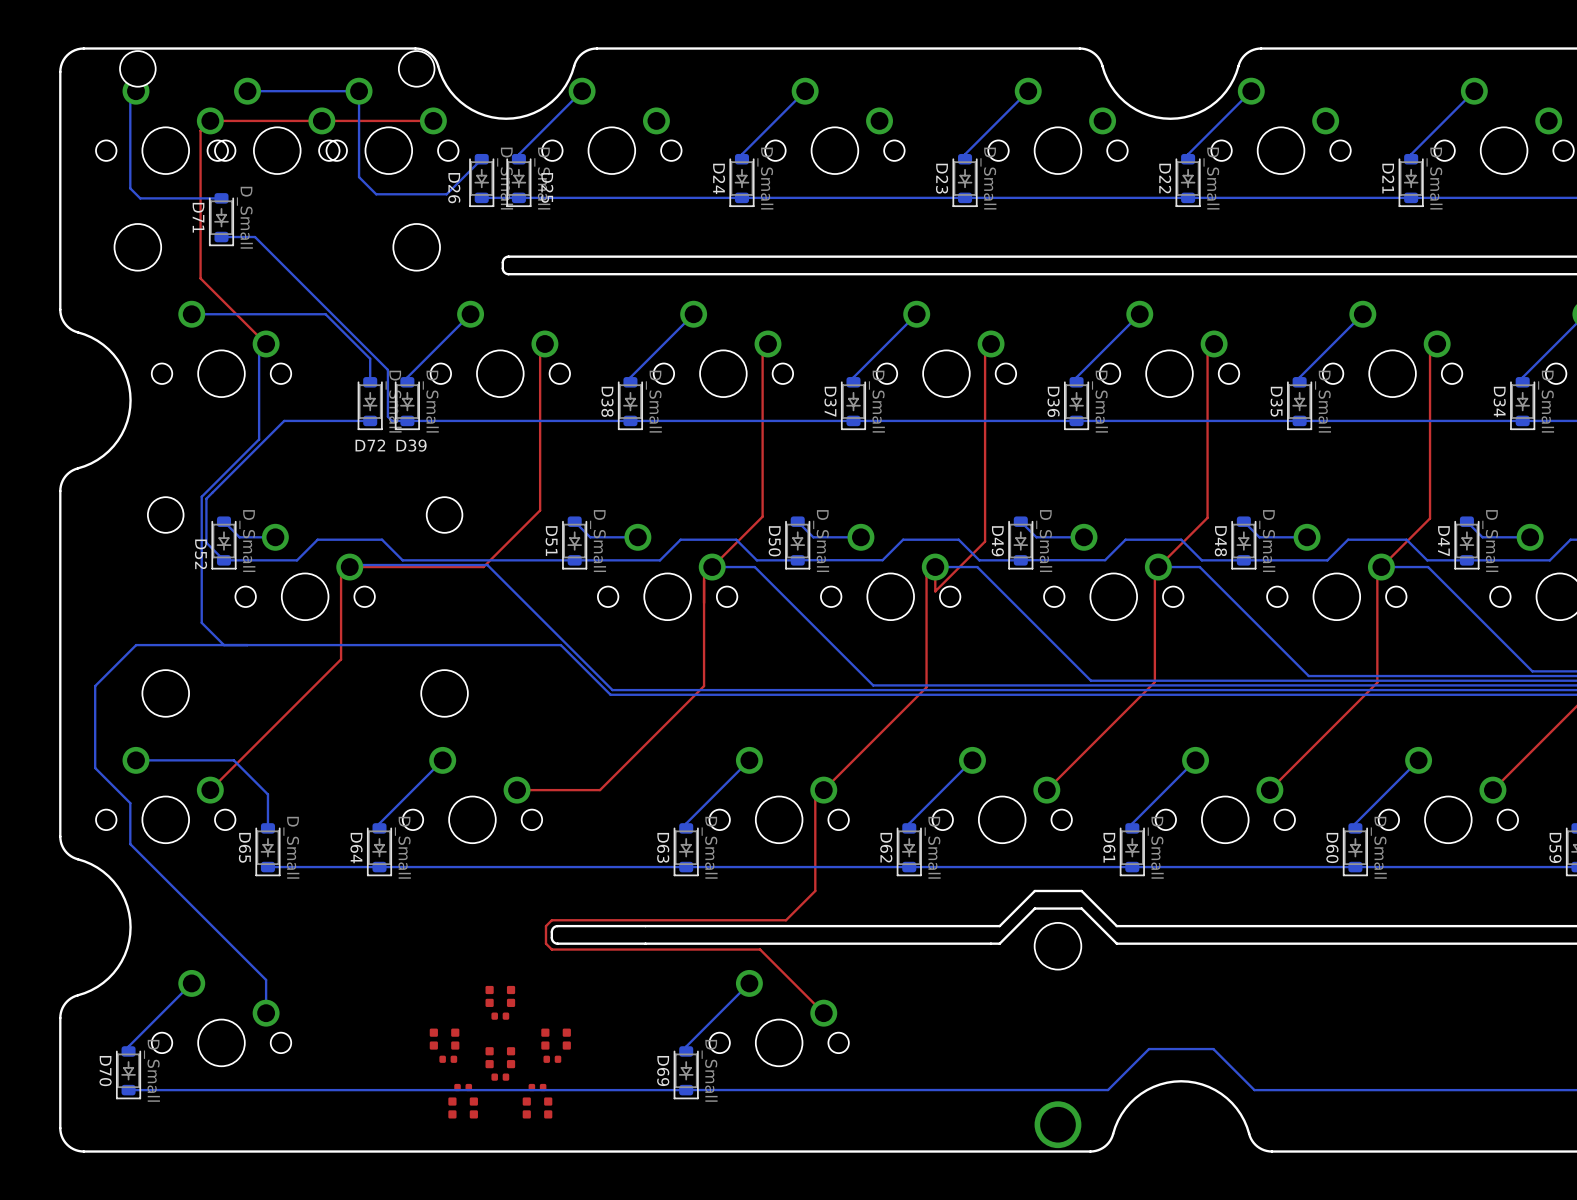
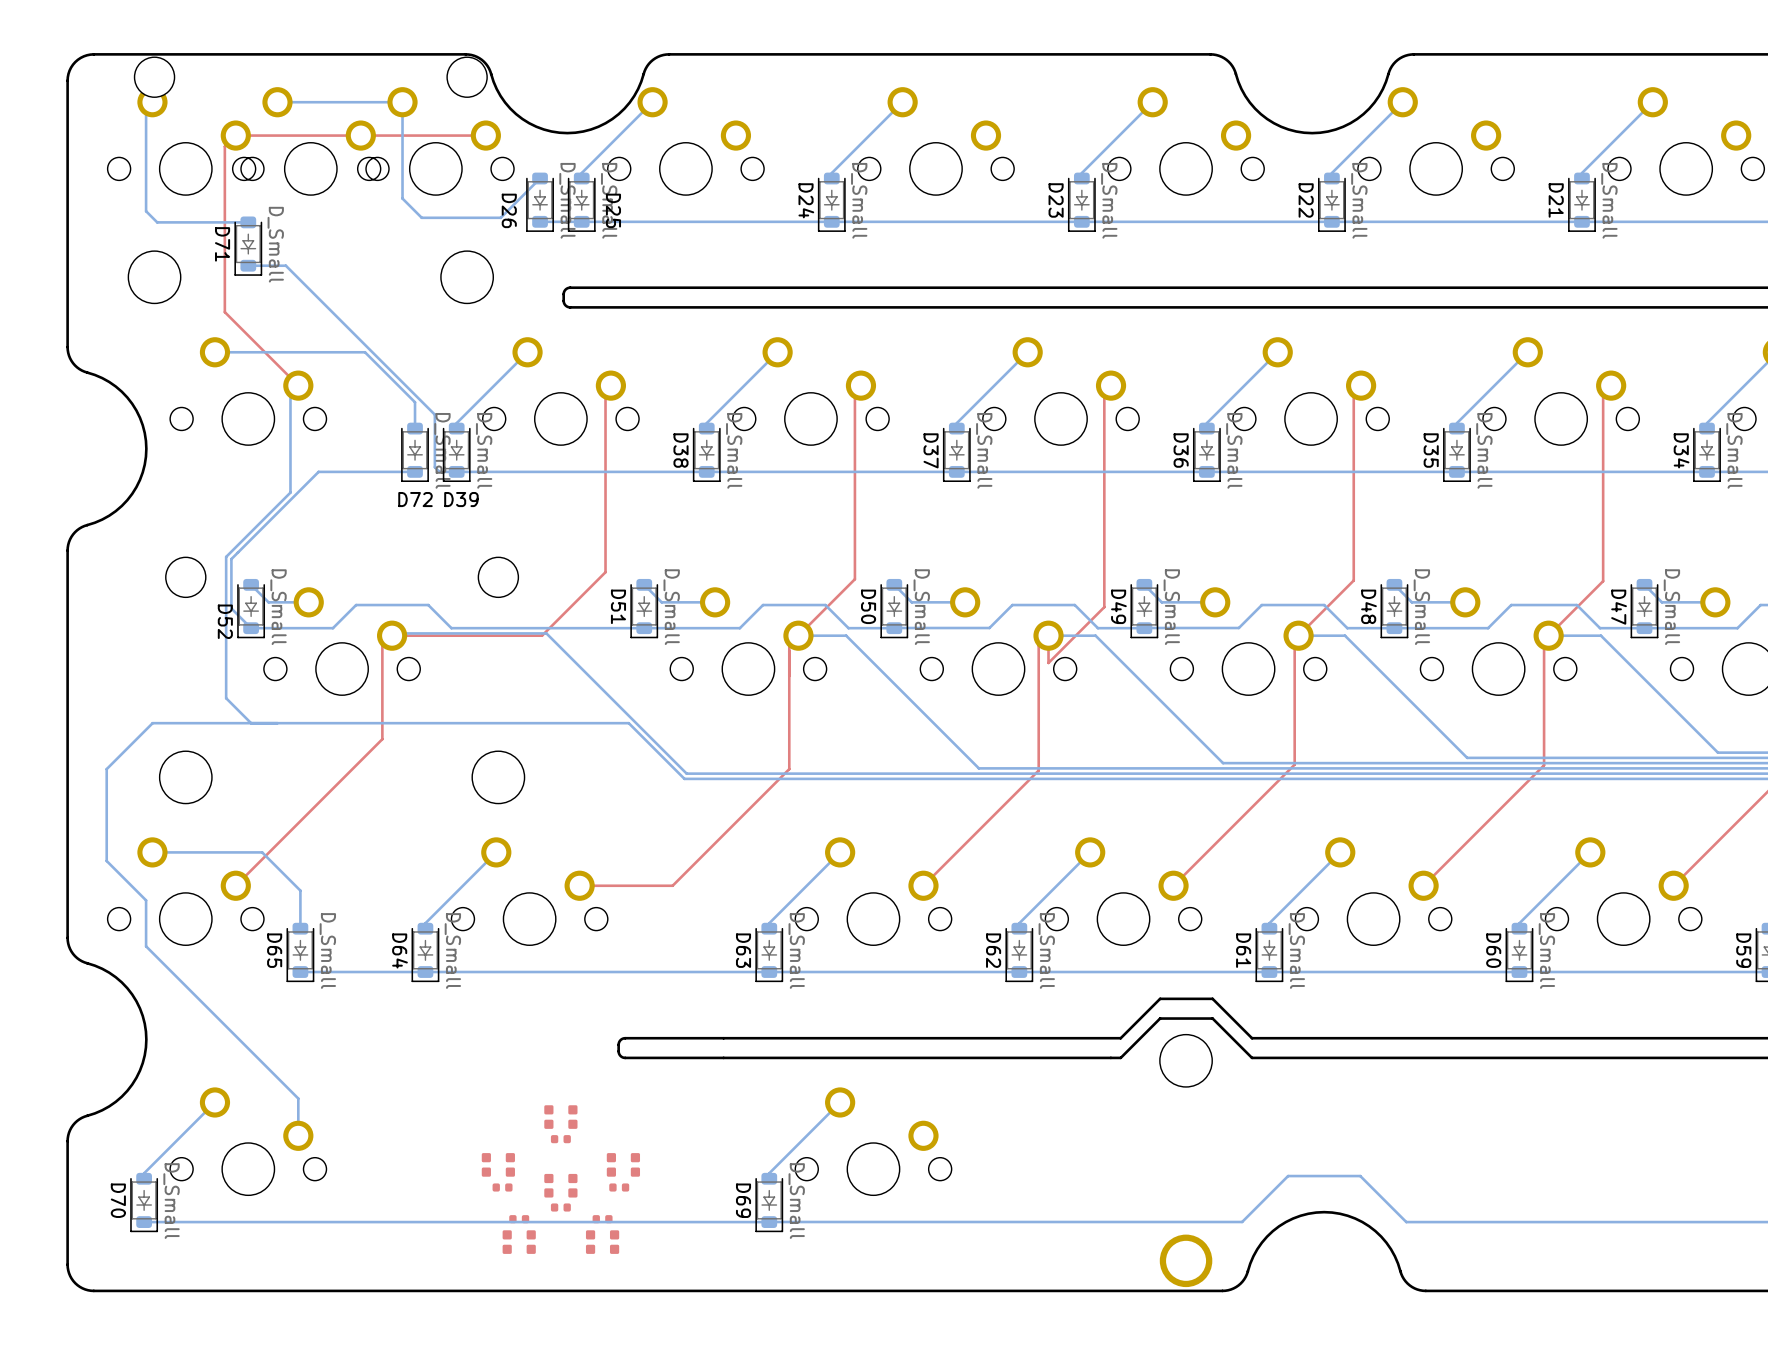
top track: (823, 790) (815, 798) (815, 890) (786, 920) (551, 920) (545, 926) (545, 943) (551, 949) (760, 949) (823, 1013) -> none

